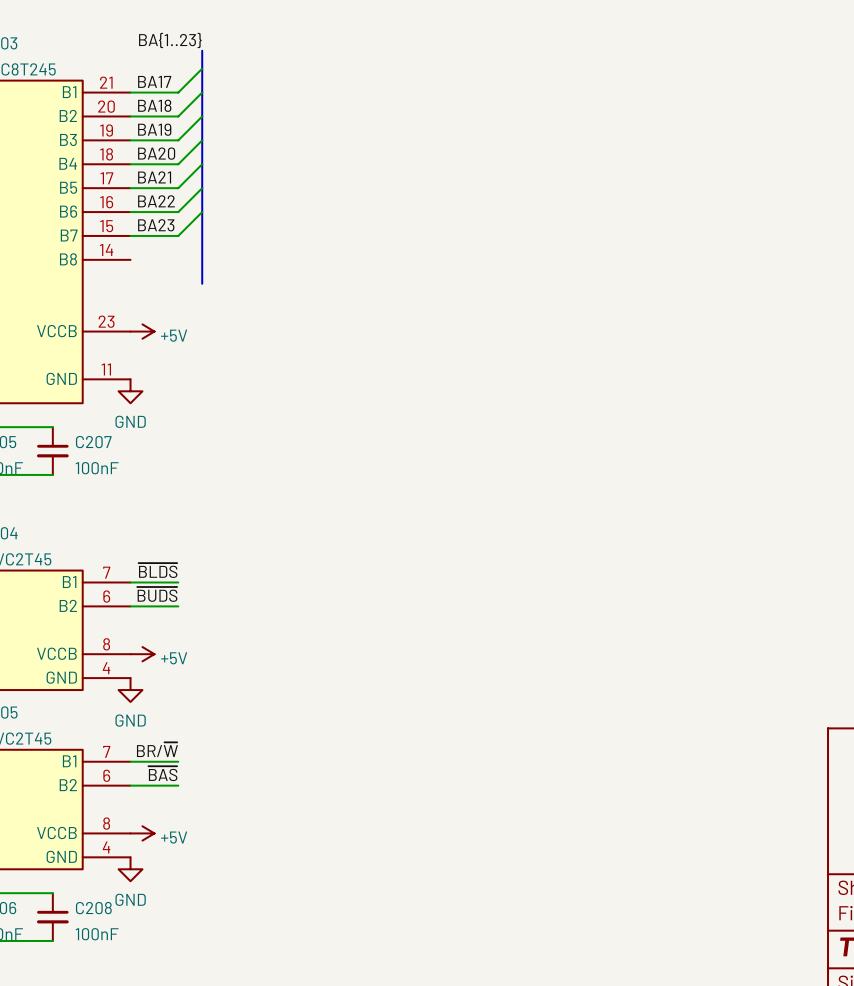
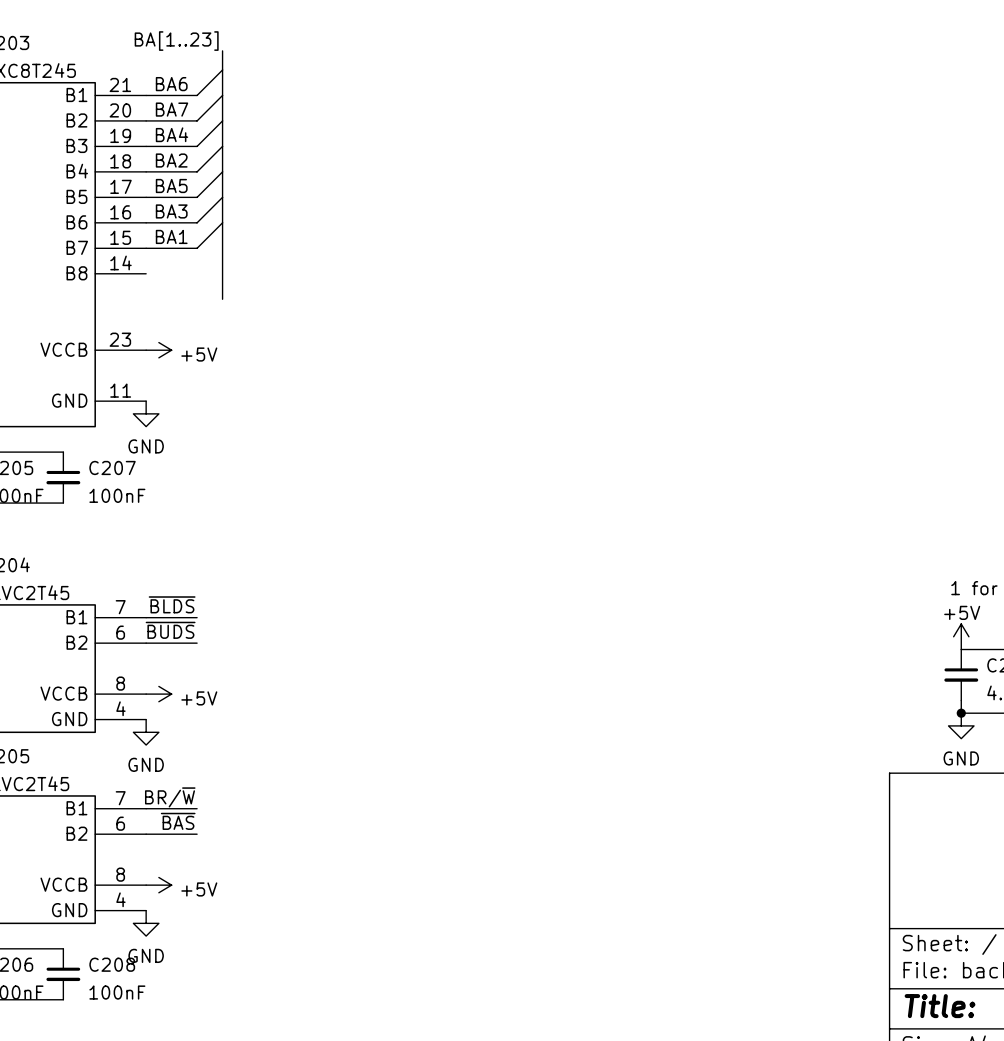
label: BA{1..23} (170, 40) -> BA[1..23] (176, 41)
label: BA17 (154, 81) -> BA6 (171, 84)
label: BA18 (154, 105) -> BA7 (172, 109)
label: BA19 (154, 129) -> BA4 (172, 134)
label: BA20 (156, 153) -> BA2 (171, 160)
label: BA21 (154, 177) -> BA5 (171, 186)
label: BA22 (156, 201) -> BA3 (171, 211)
label: BA23 (156, 225) -> BA1 (171, 236)

